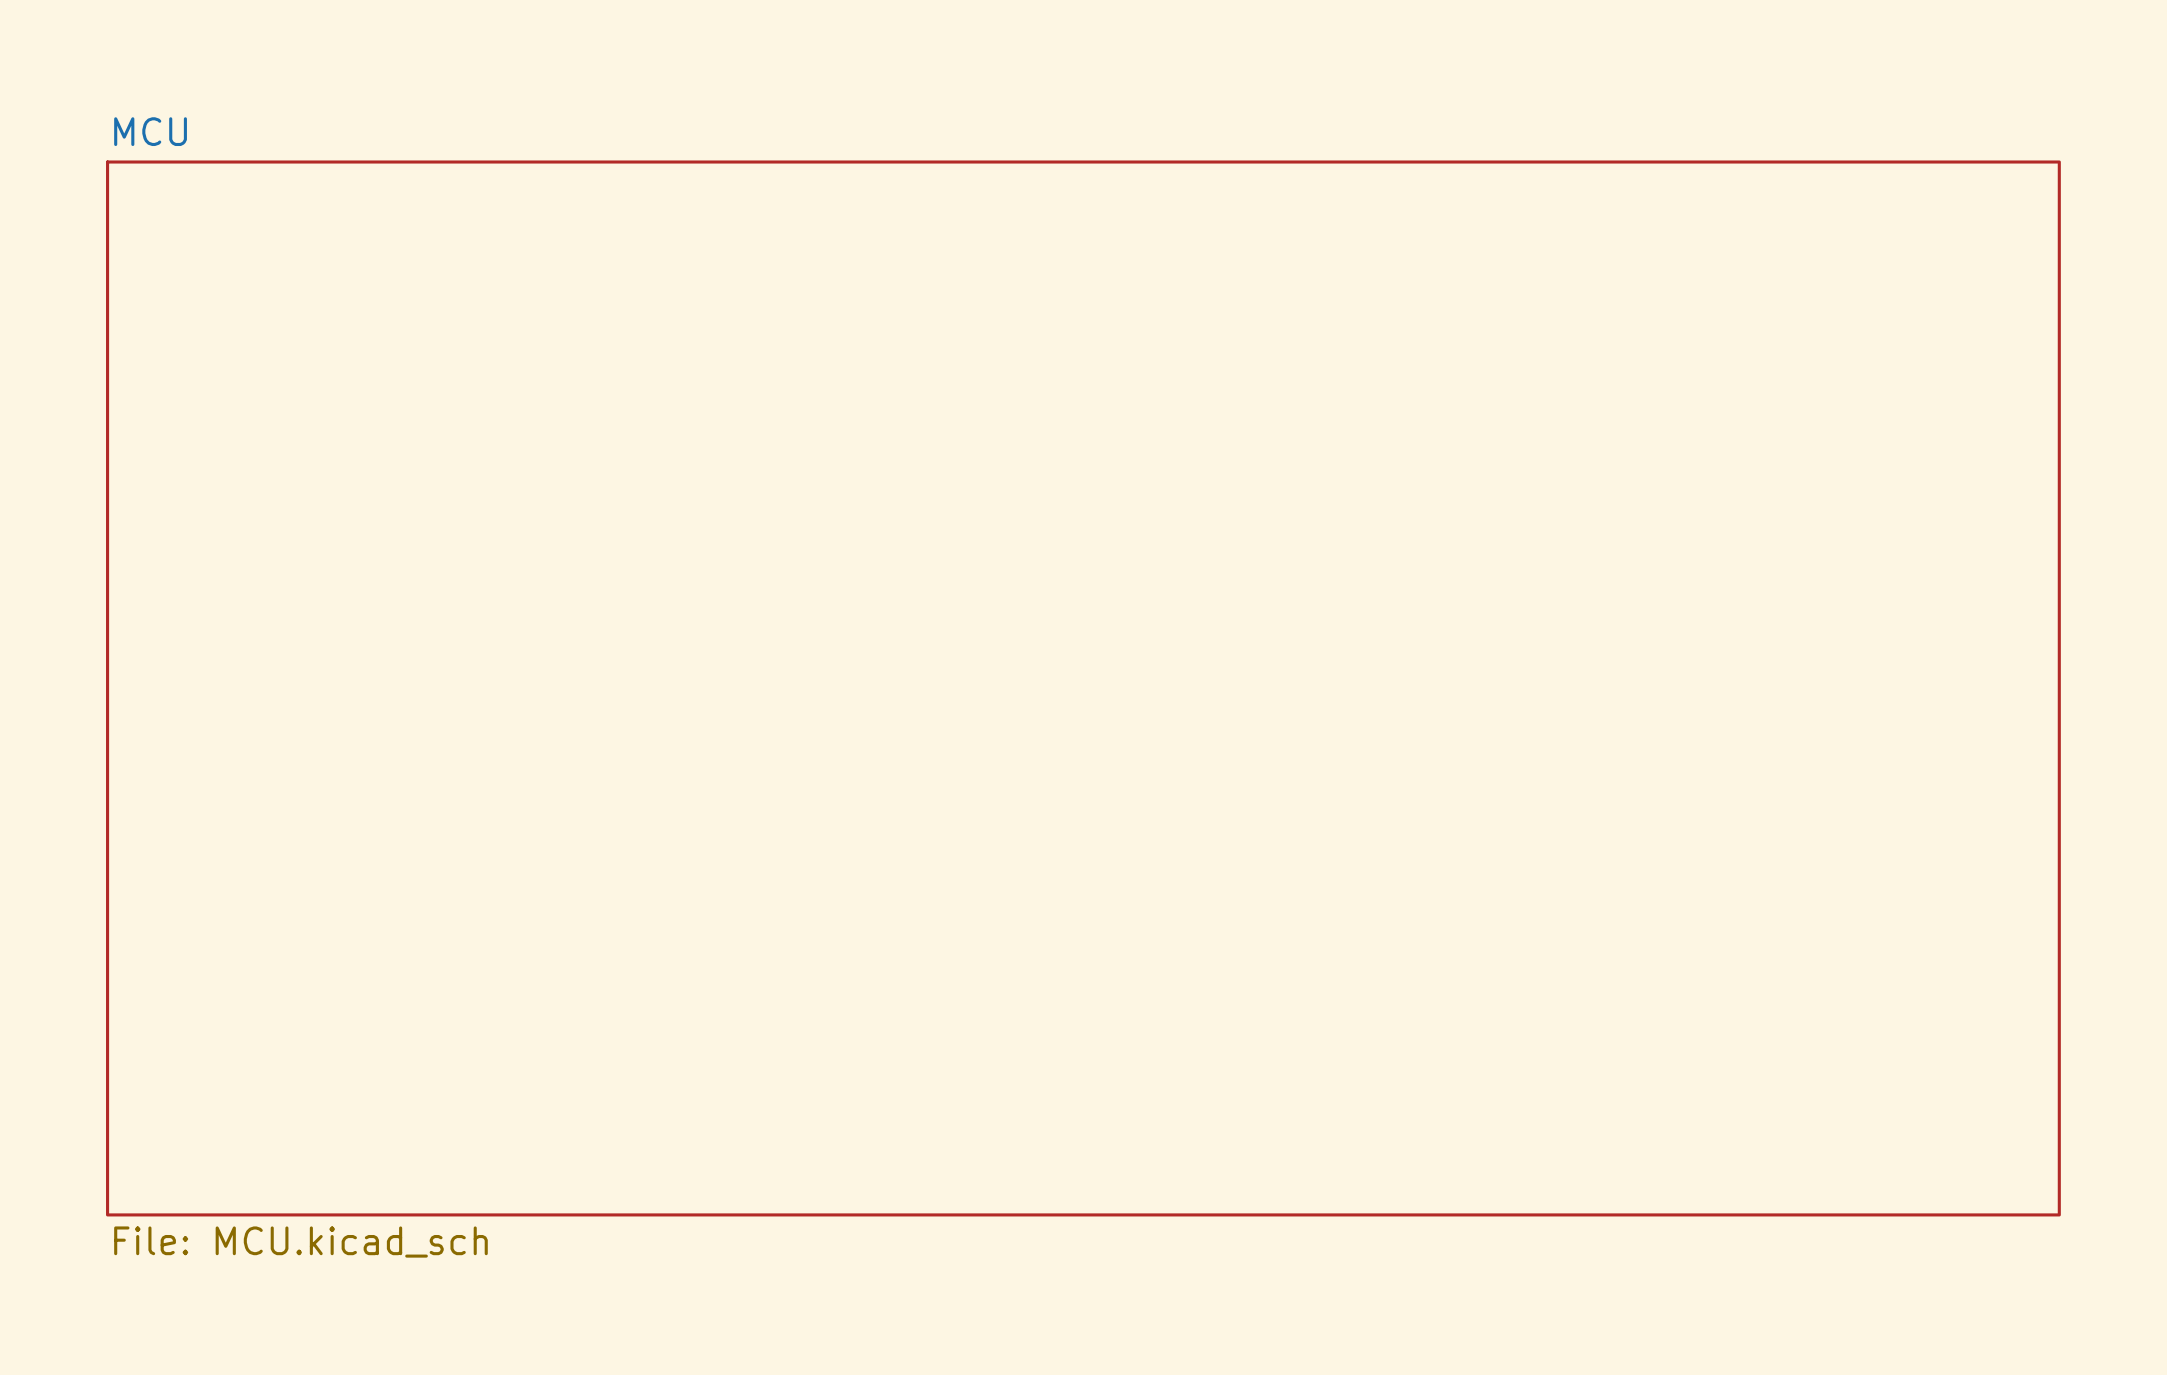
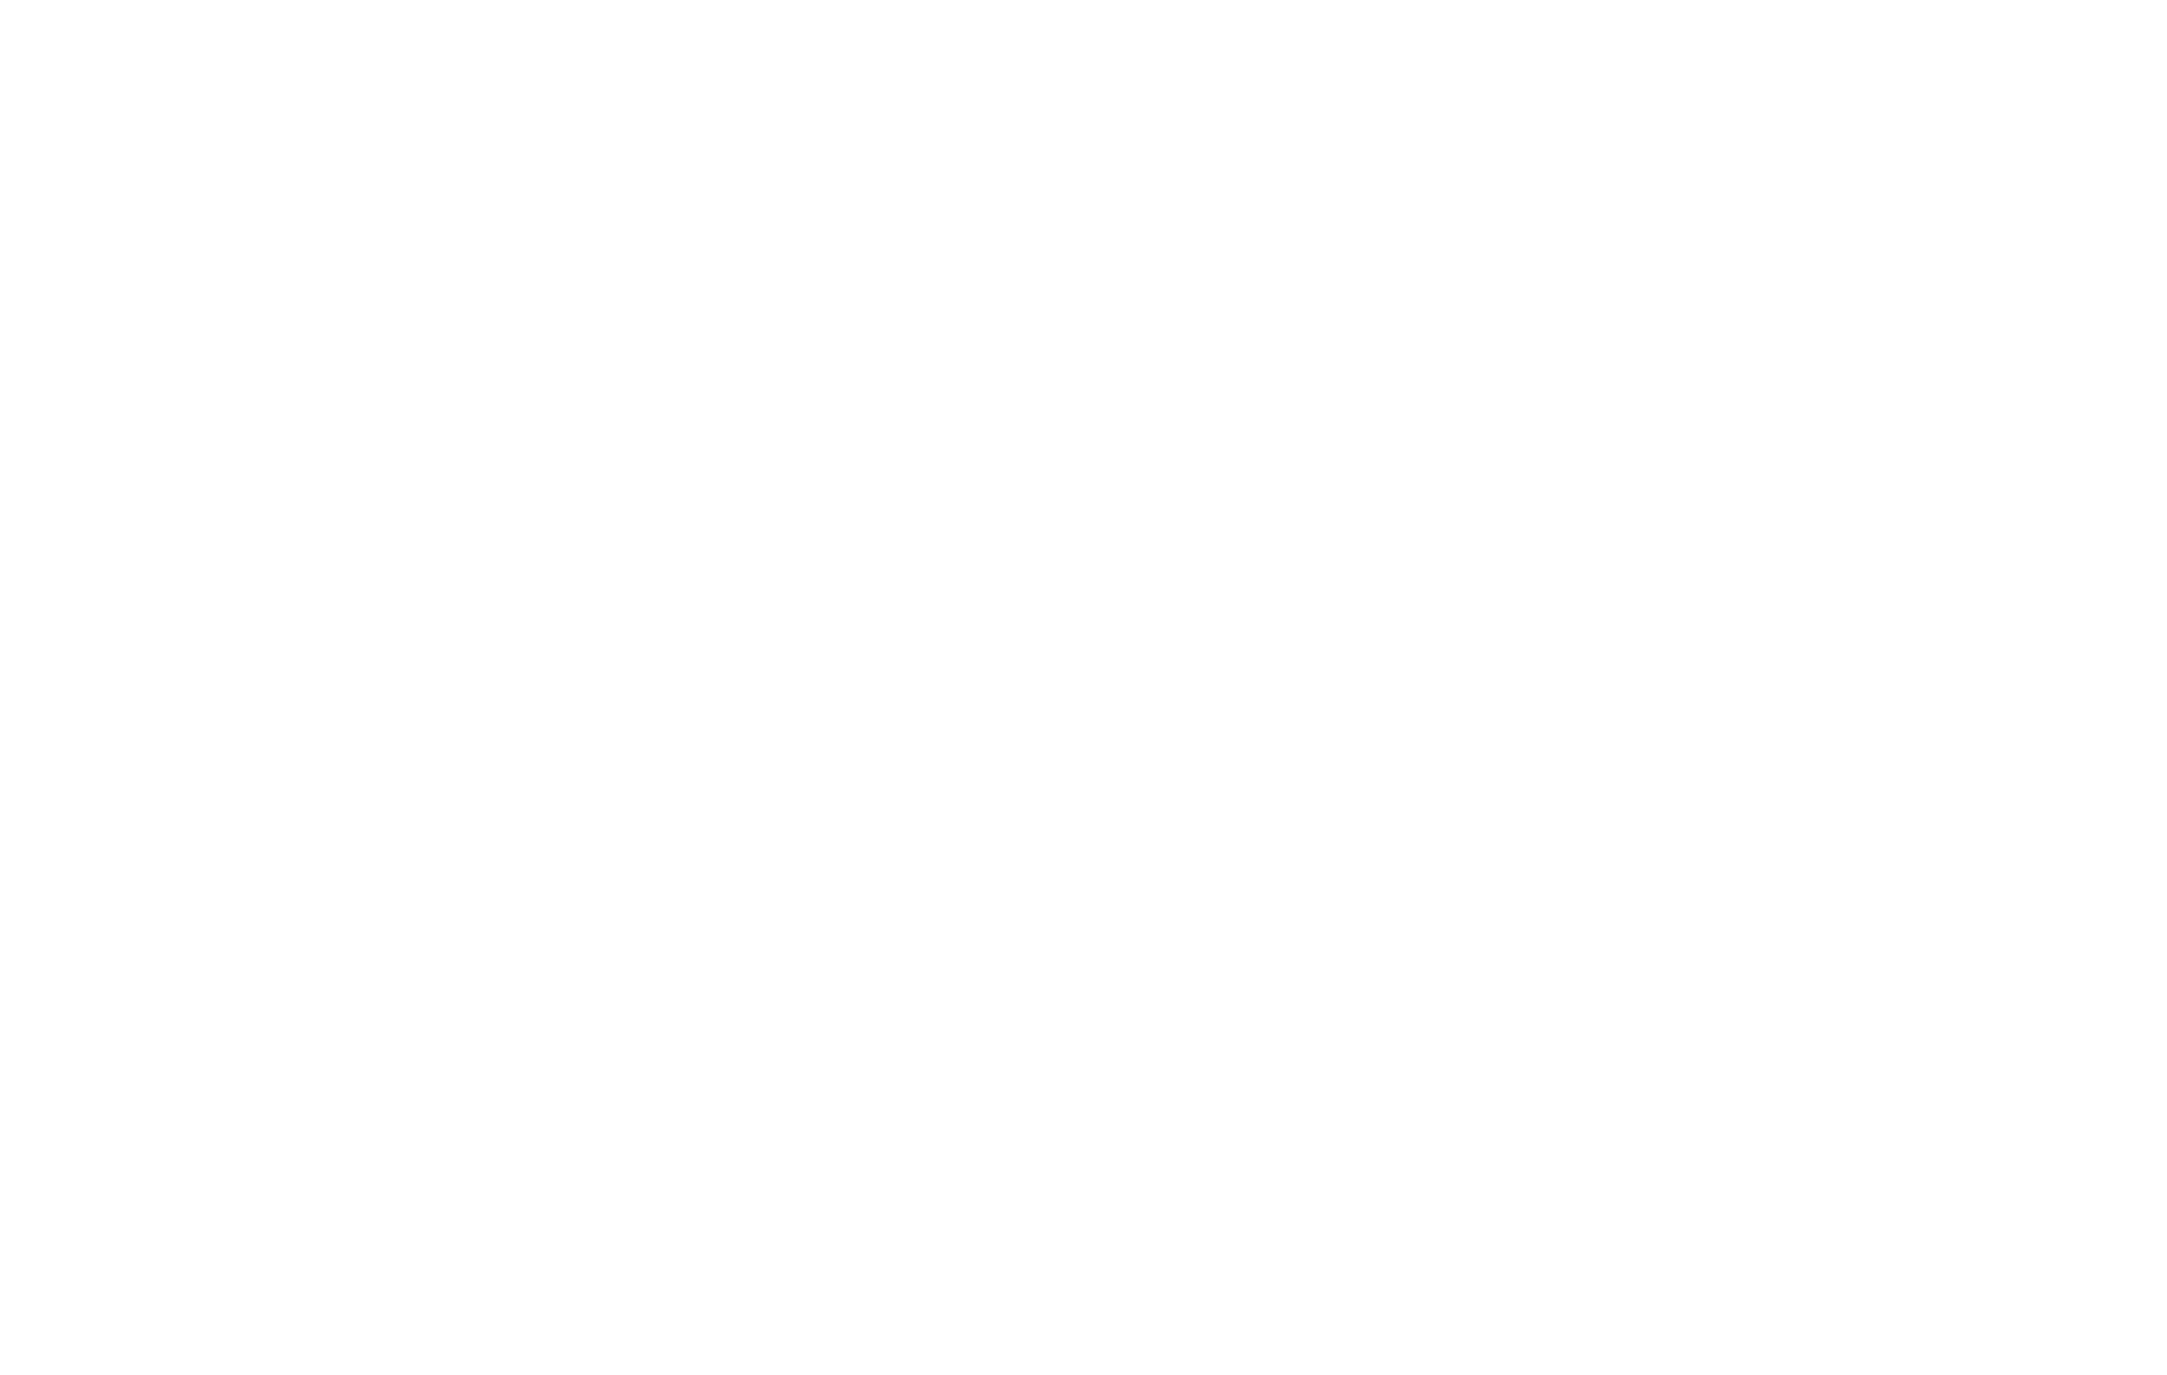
sheet MCU: File: MCU.kicad_sch (1083, 688) -> none

